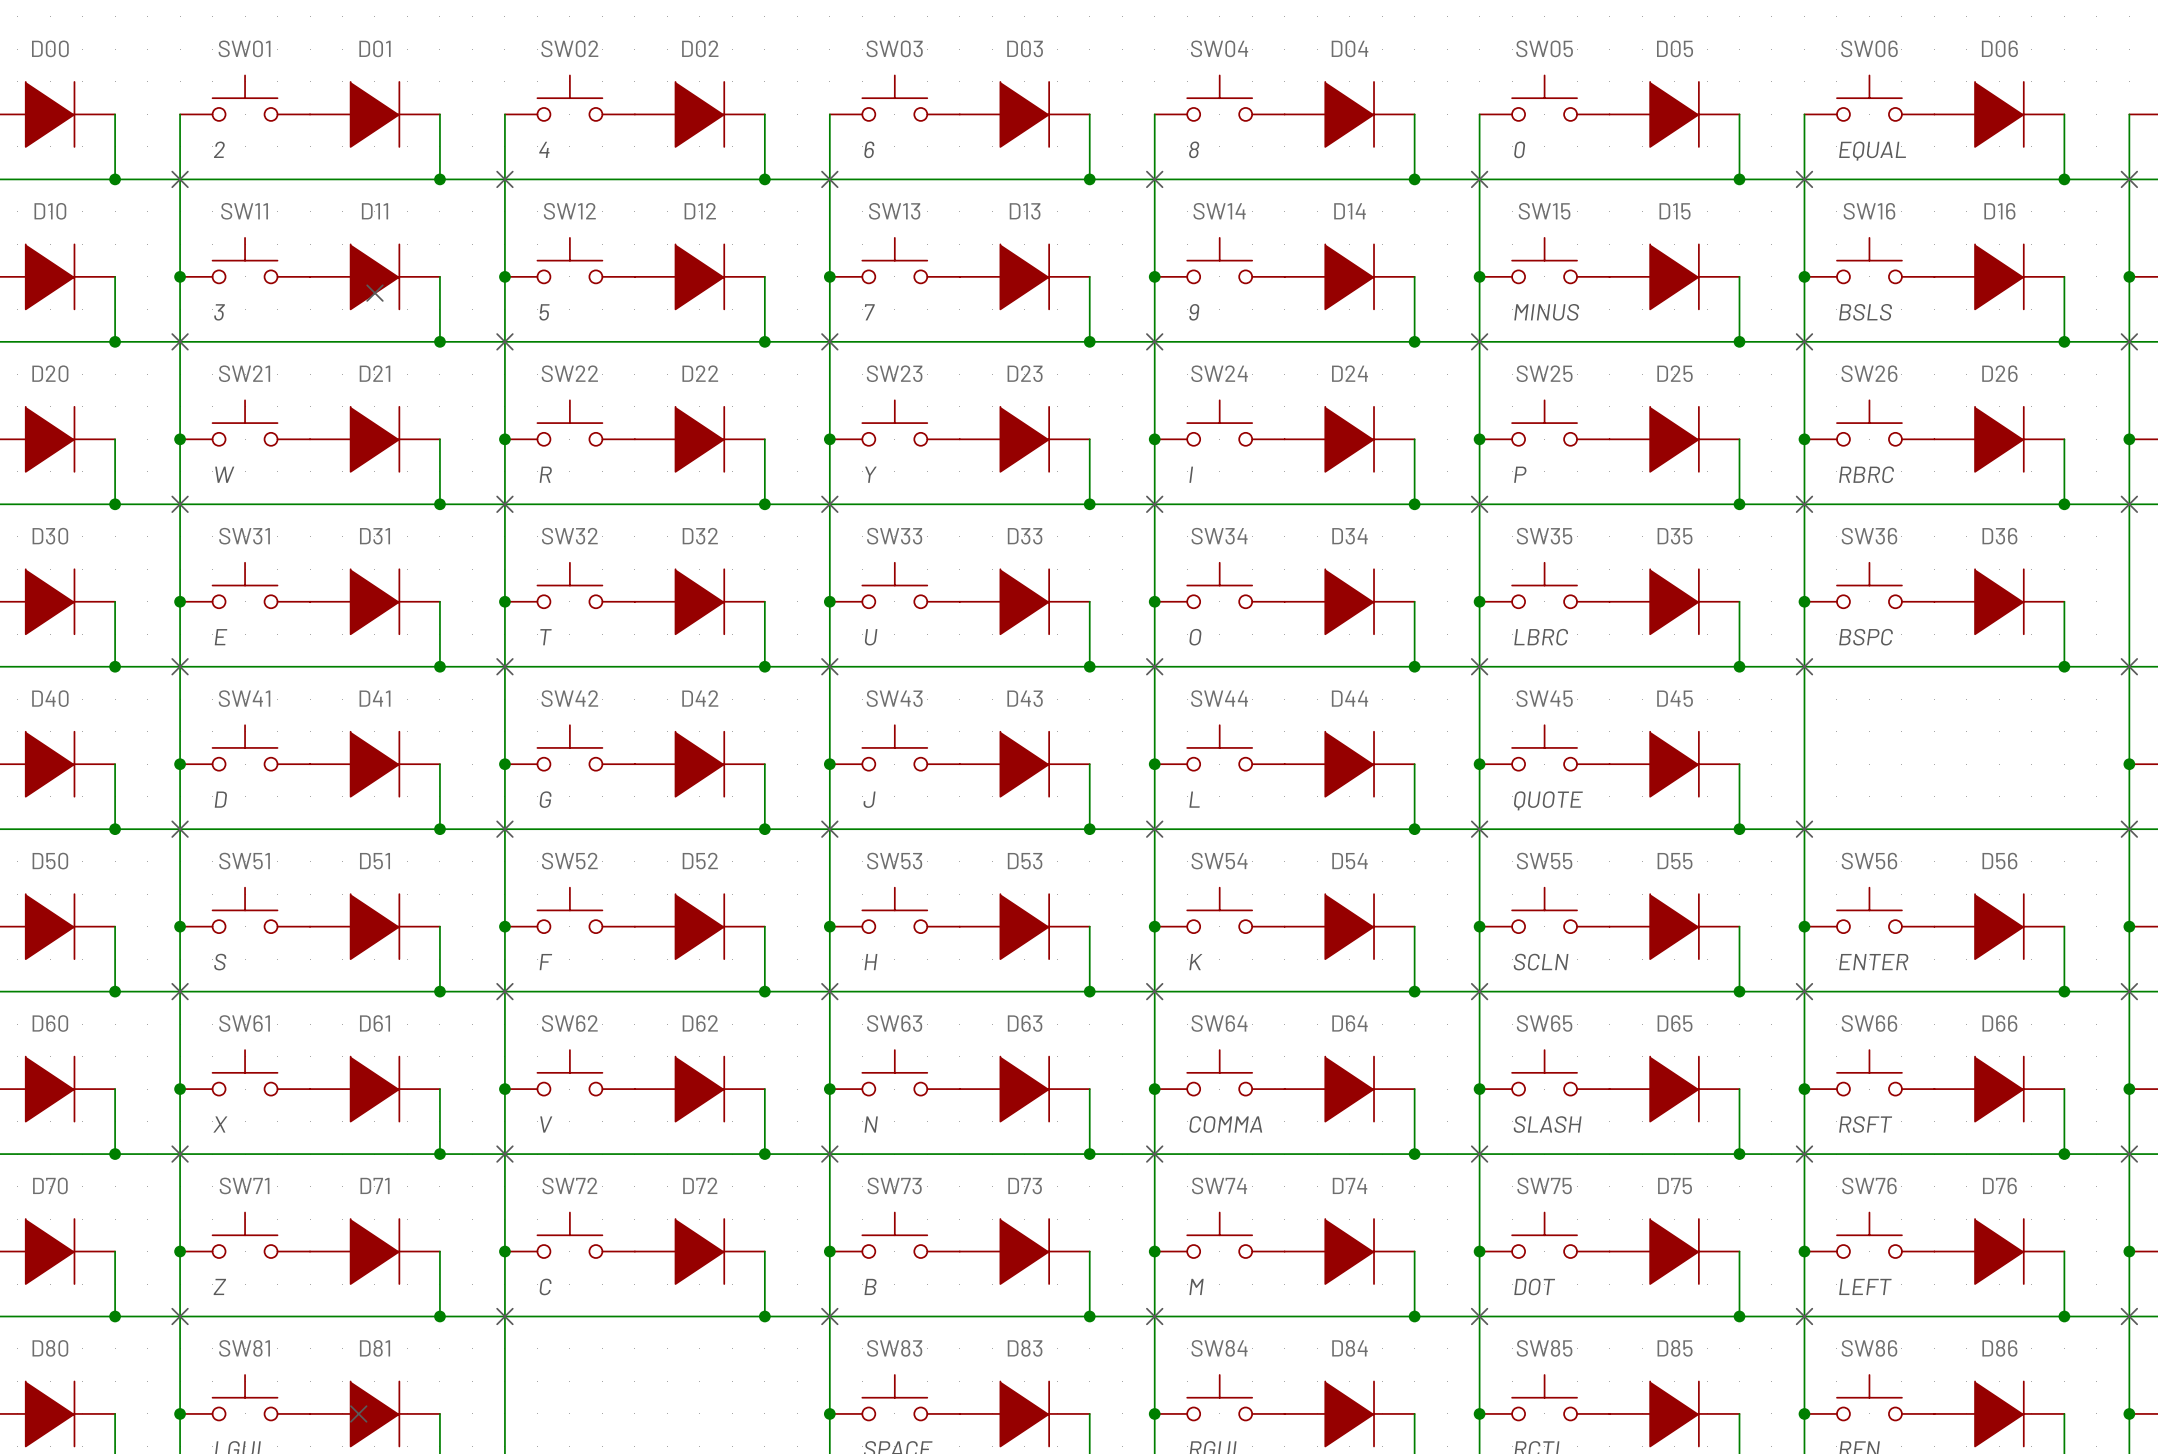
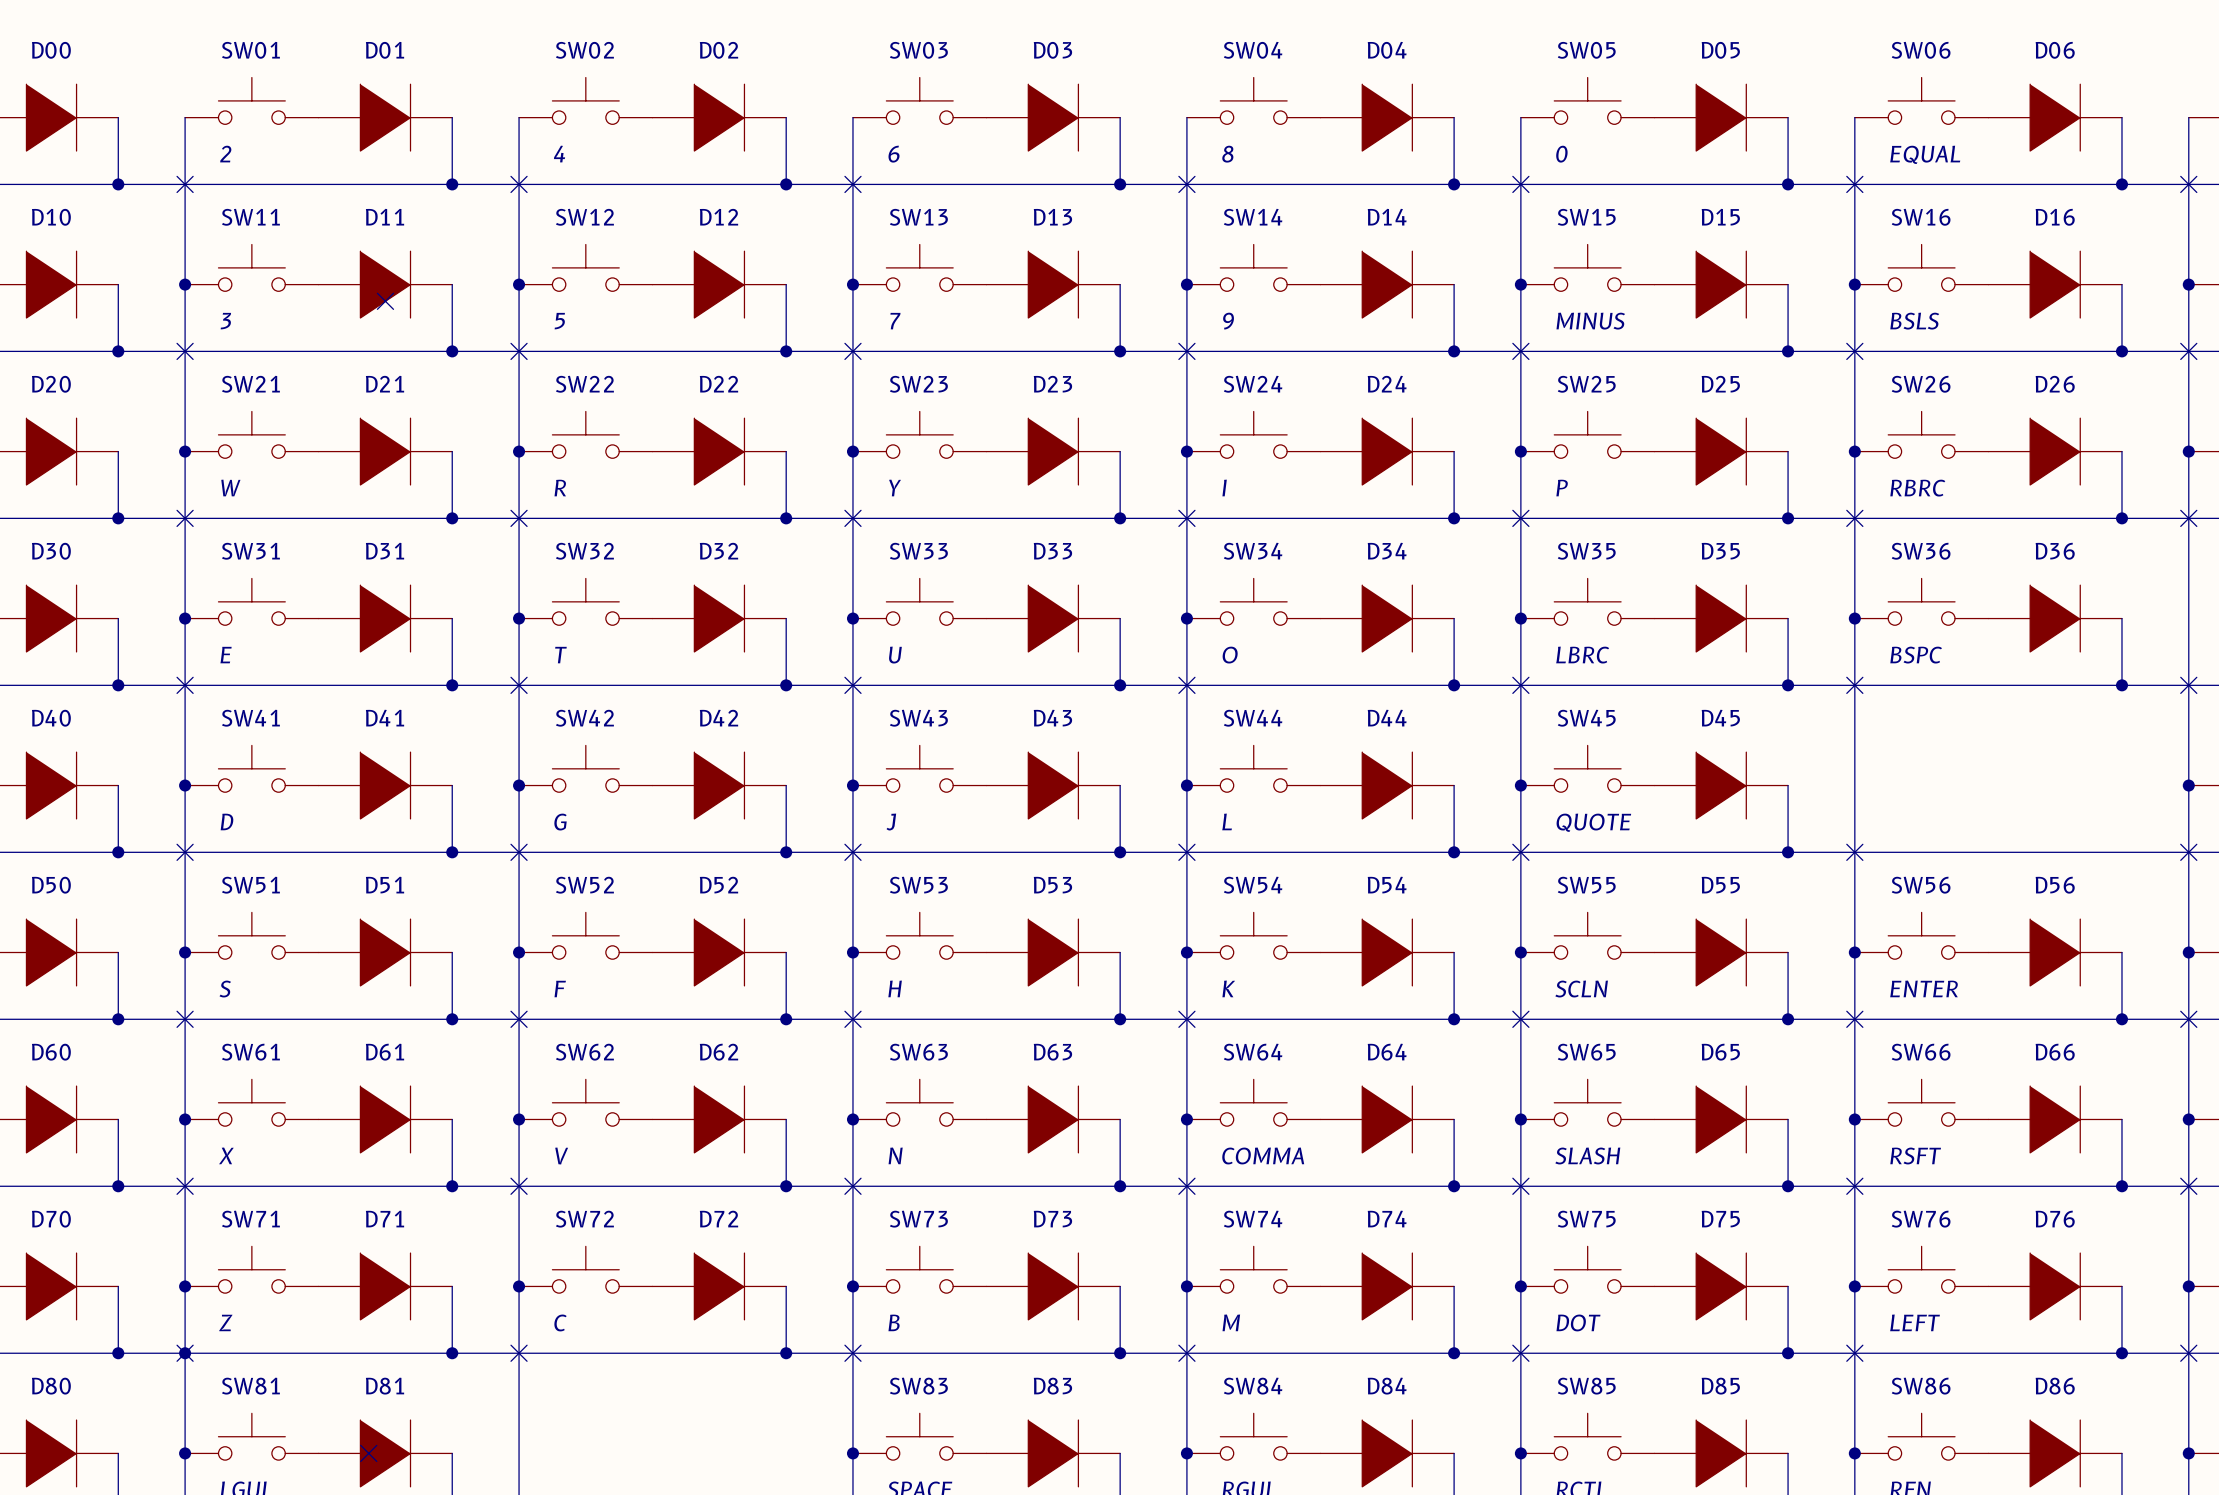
junction: none -> (185, 1353)

